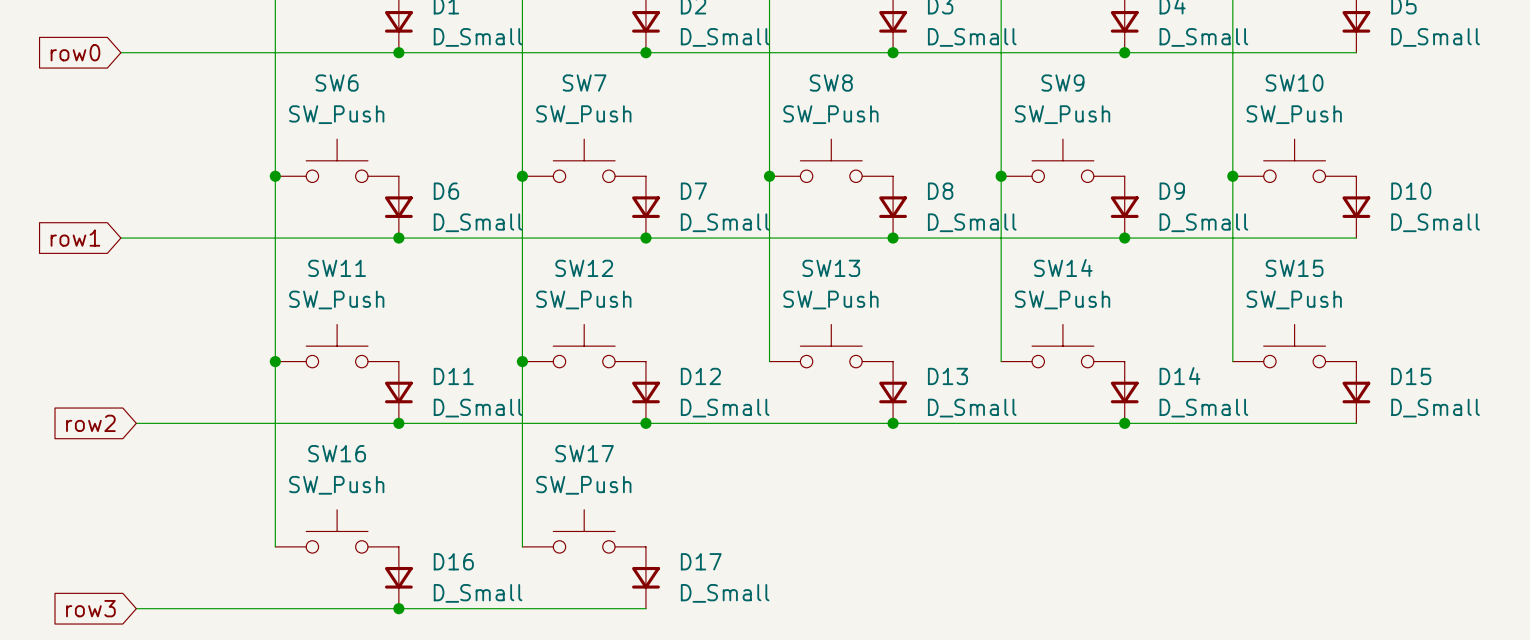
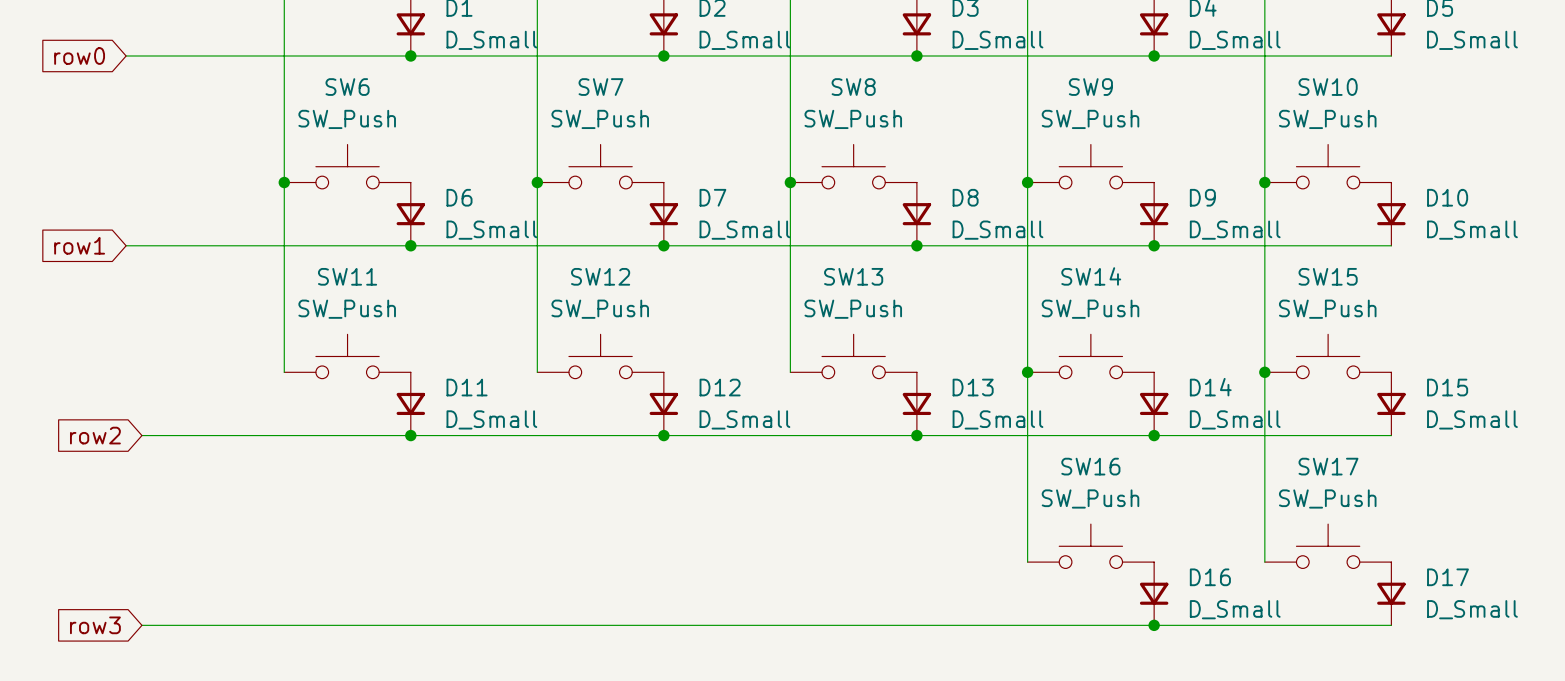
wire: (275, 361) (275, 546) -> none
junction: (275, 361) -> none
wire: (522, 361) (522, 546) -> none
junction: (522, 361) -> none
wire: none -> (1027, 372) (1027, 562)
junction: none -> (1027, 372)
wire: none -> (1264, 372) (1264, 562)
junction: none -> (1264, 372)
SW16 position: (337, 531) -> (1090, 546)
SW17 position: (584, 531) -> (1328, 546)
D16 position: (398, 577) -> (1154, 593)
D17 position: (645, 577) -> (1391, 593)
junction: (398, 608) -> none
wire: none -> (663, 625) (1391, 625)
junction: none -> (1154, 625)

